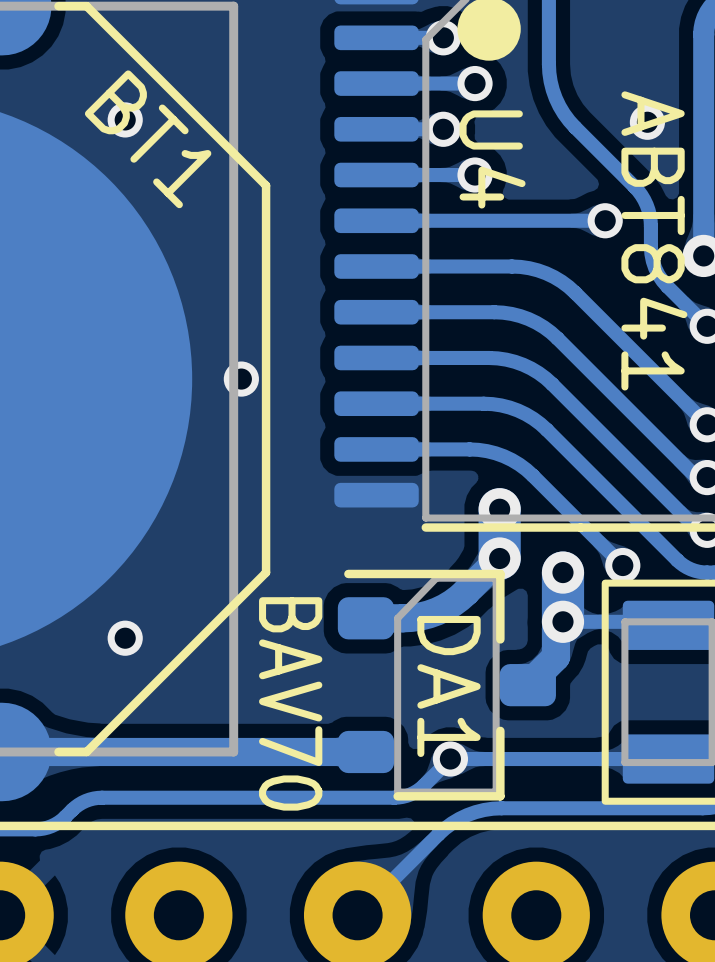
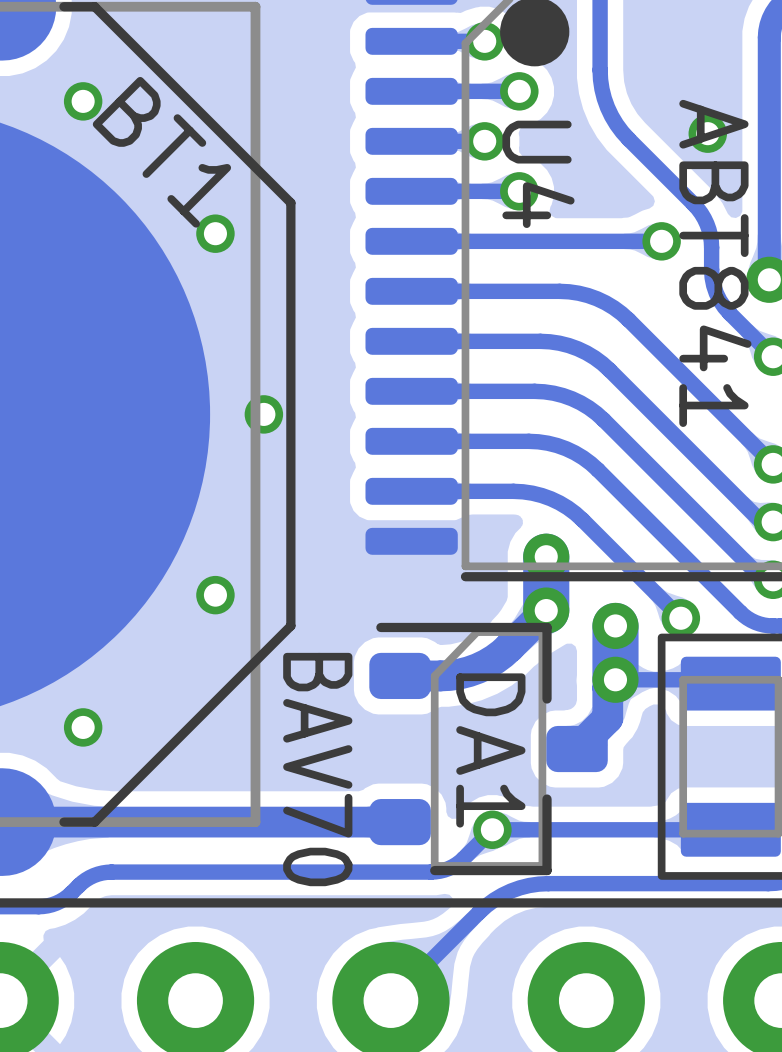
via position: (125, 119) -> (83, 101)
via: none -> (215, 233)
via: none -> (215, 595)
via position: (125, 638) -> (83, 727)

